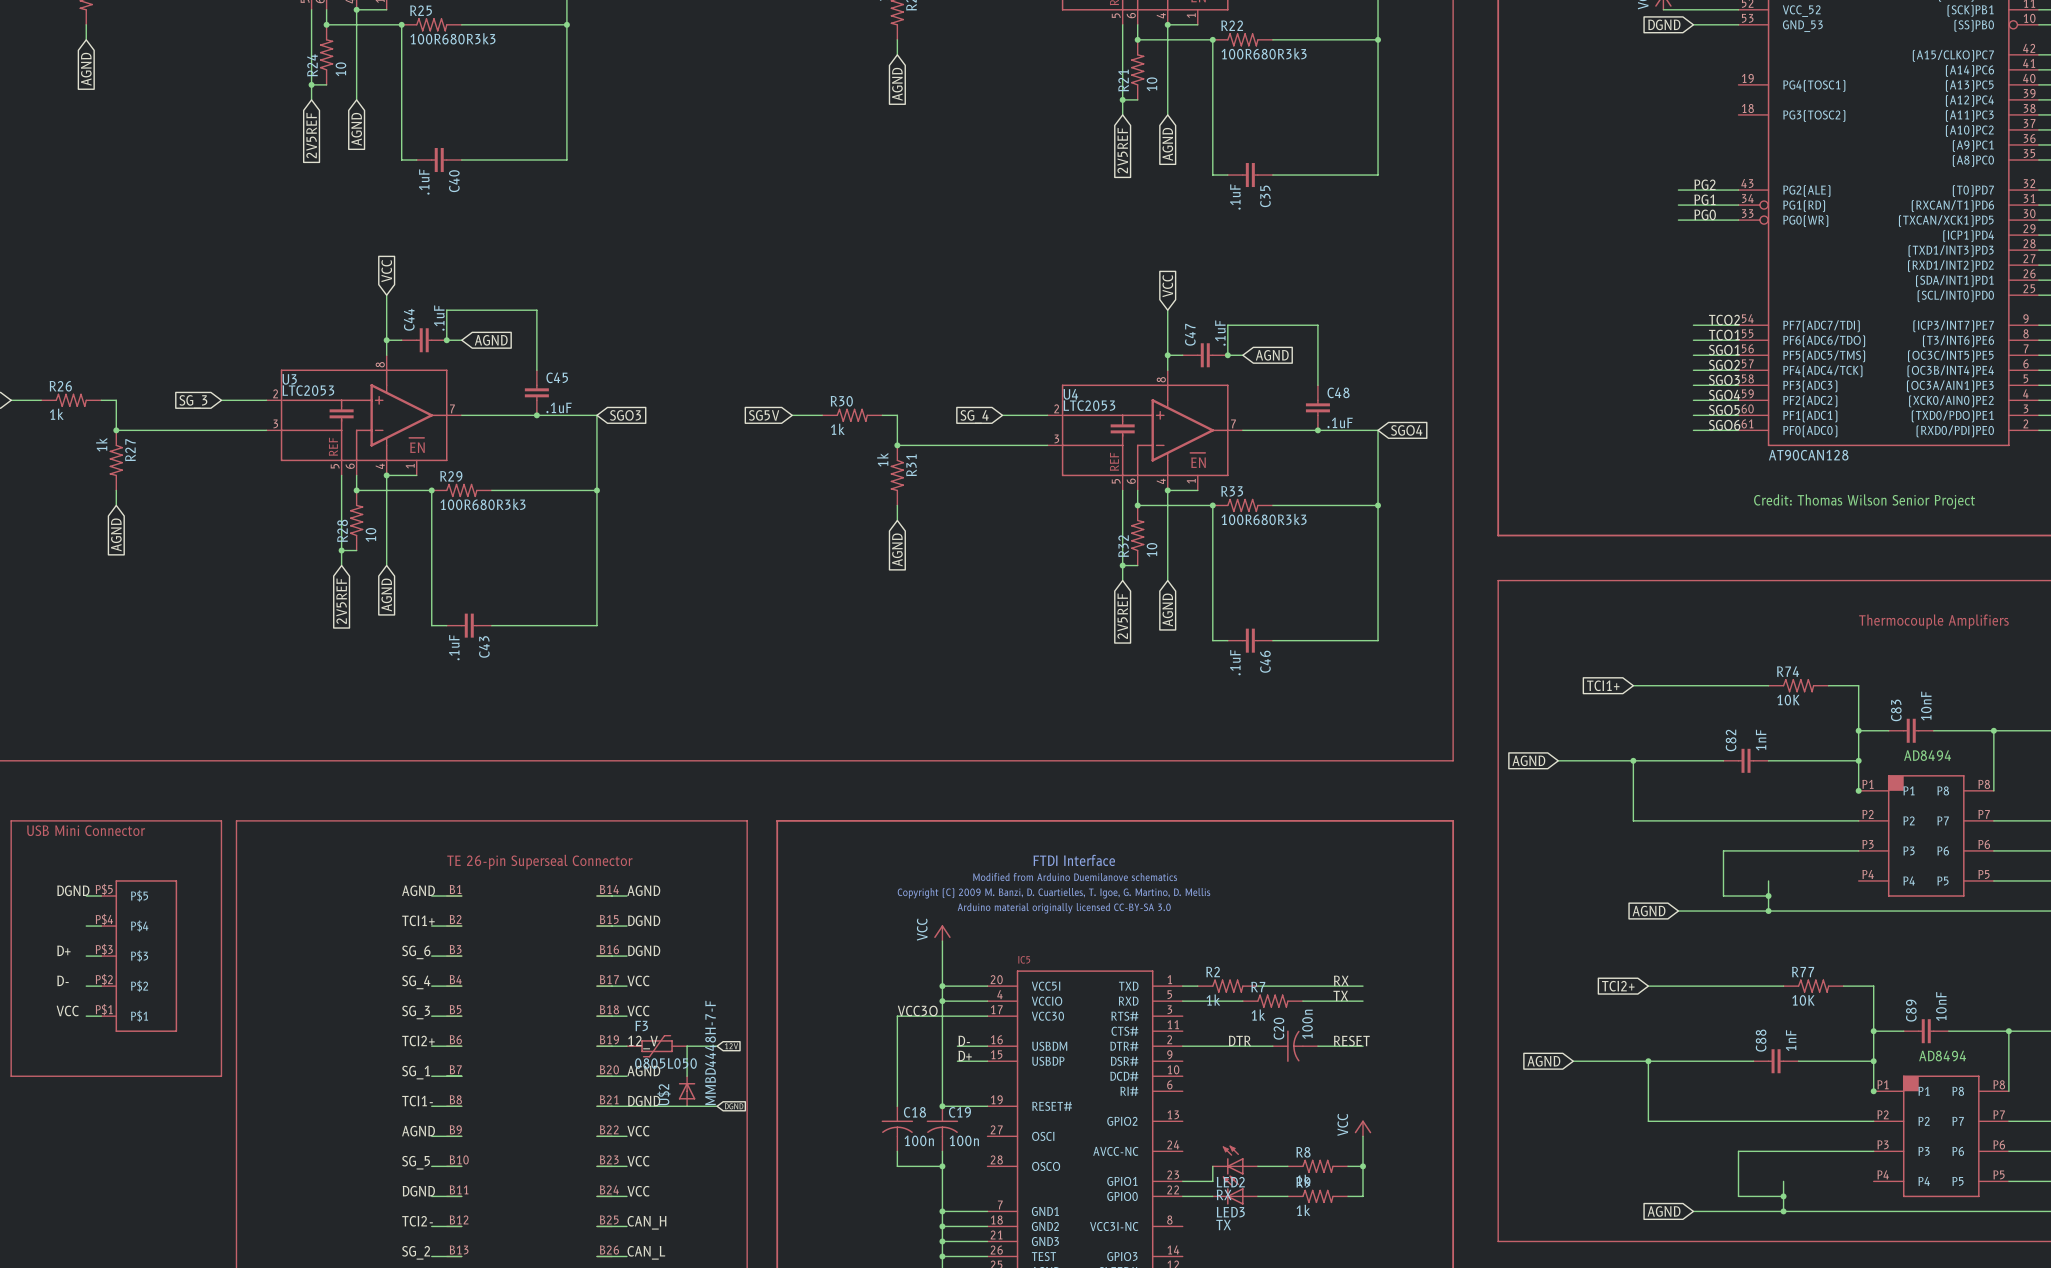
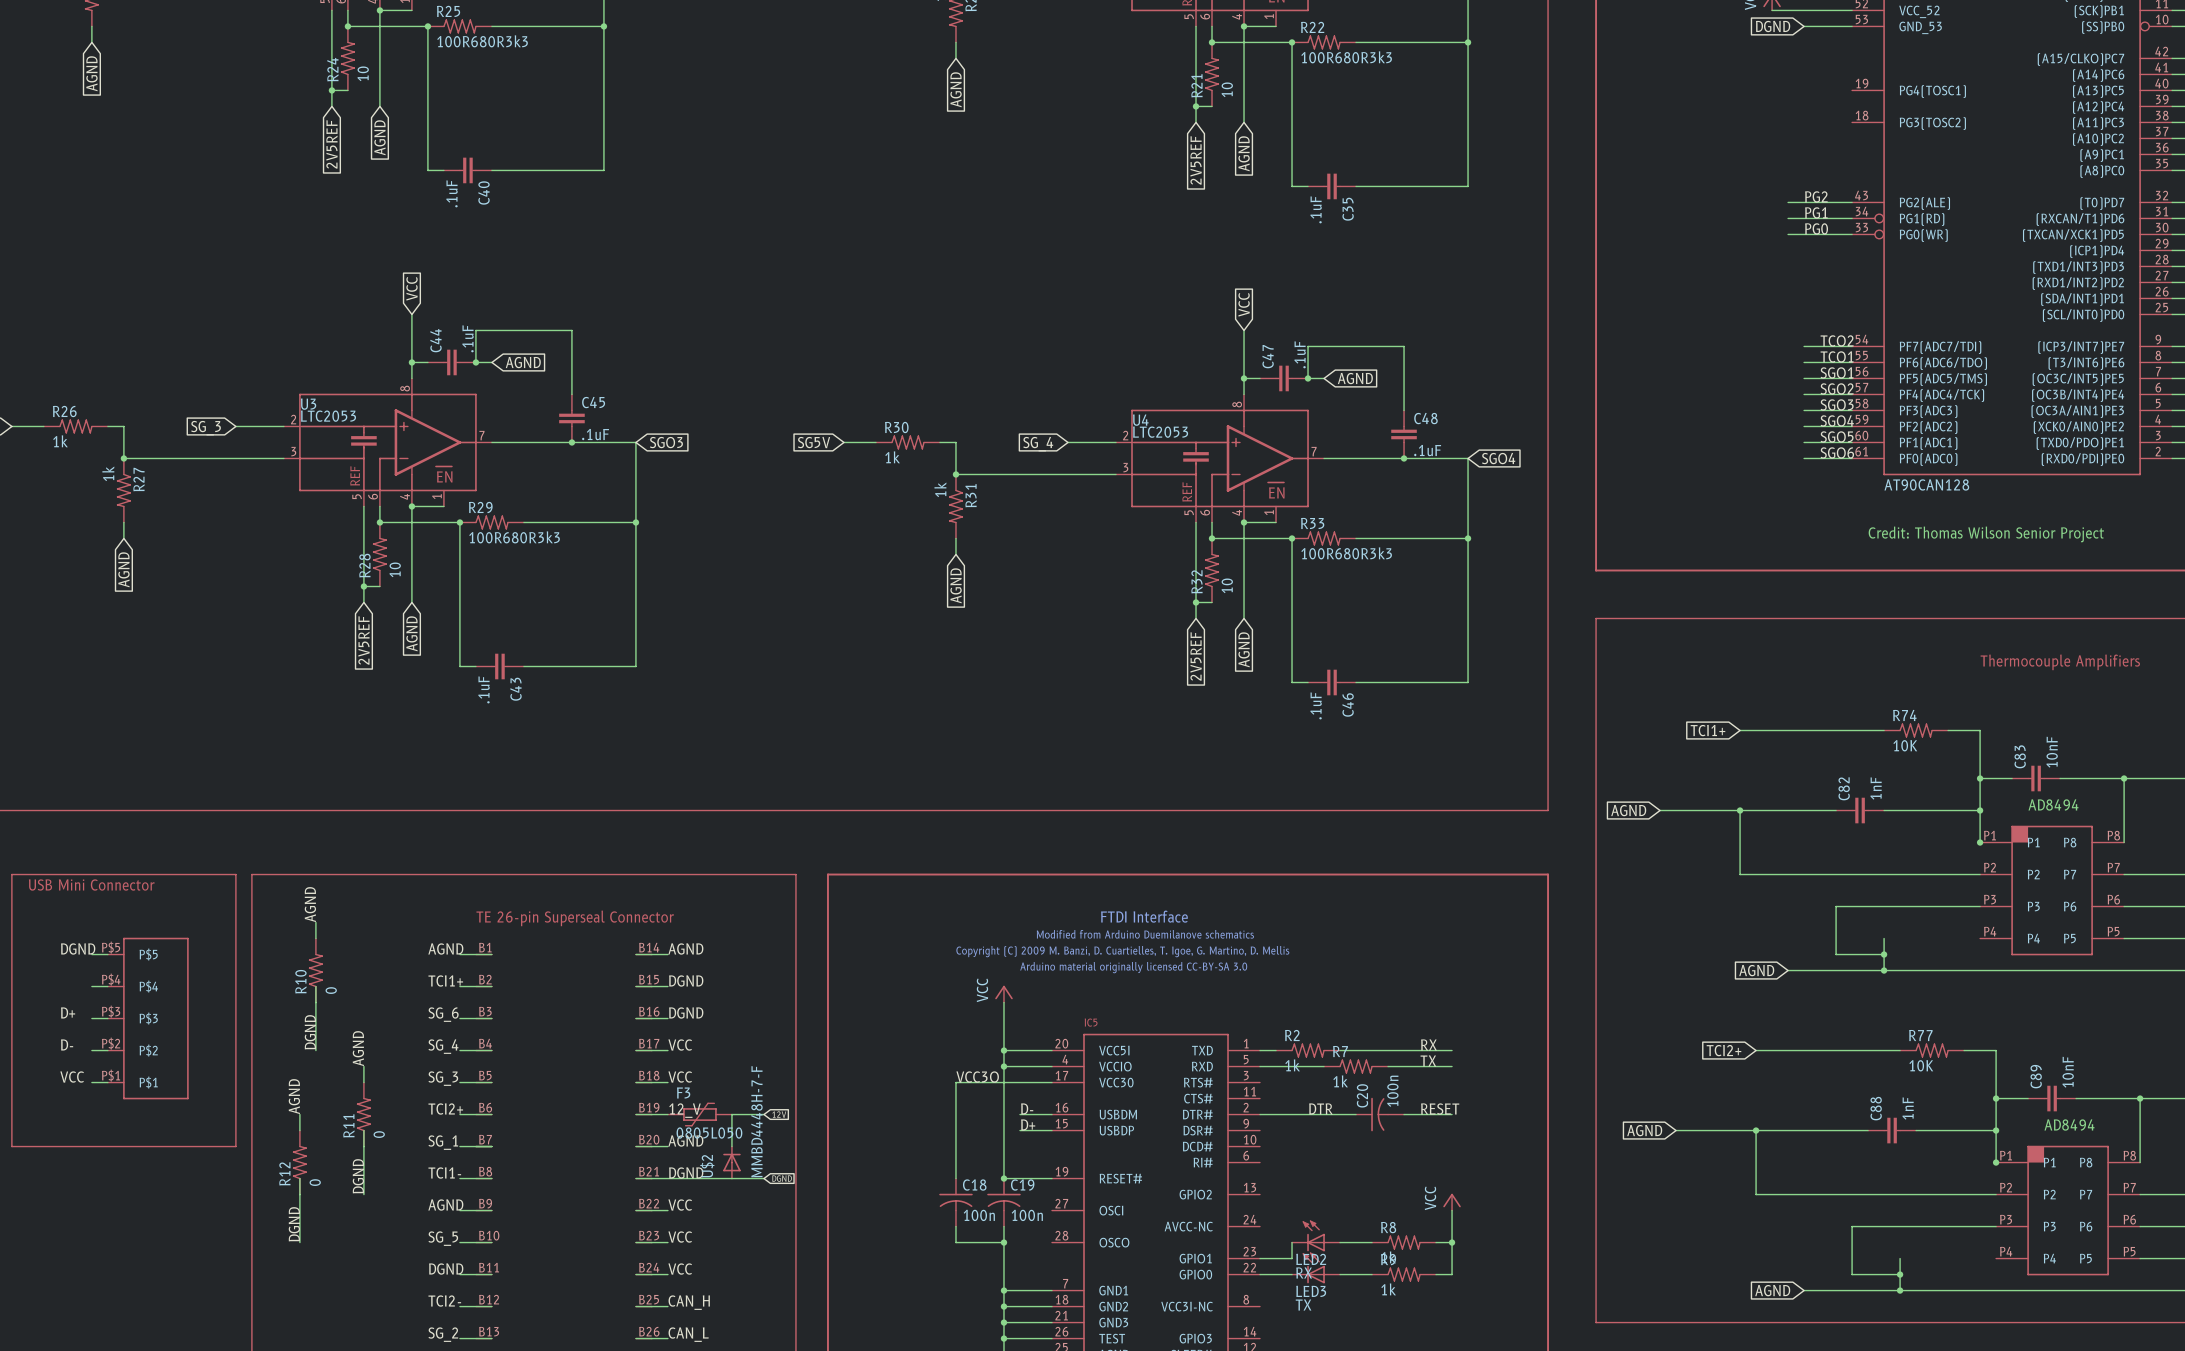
label: none -> AGND (310, 904)
wire: none -> (315, 922) (315, 938)
R10: none -> 0 (315, 970)
wire: none -> (315, 986) (315, 1050)
label: none -> DGND (310, 1032)
label: none -> AGND (358, 1048)
wire: none -> (363, 1066) (363, 1082)
label: none -> AGND (294, 1096)
wire: none -> (299, 1114) (299, 1130)
R11: none -> 0 (363, 1114)
wire: none -> (363, 1130) (363, 1194)
R12: none -> 0 (299, 1162)
label: none -> DGND (358, 1176)
wire: none -> (299, 1178) (299, 1242)
label: none -> DGND (294, 1224)

